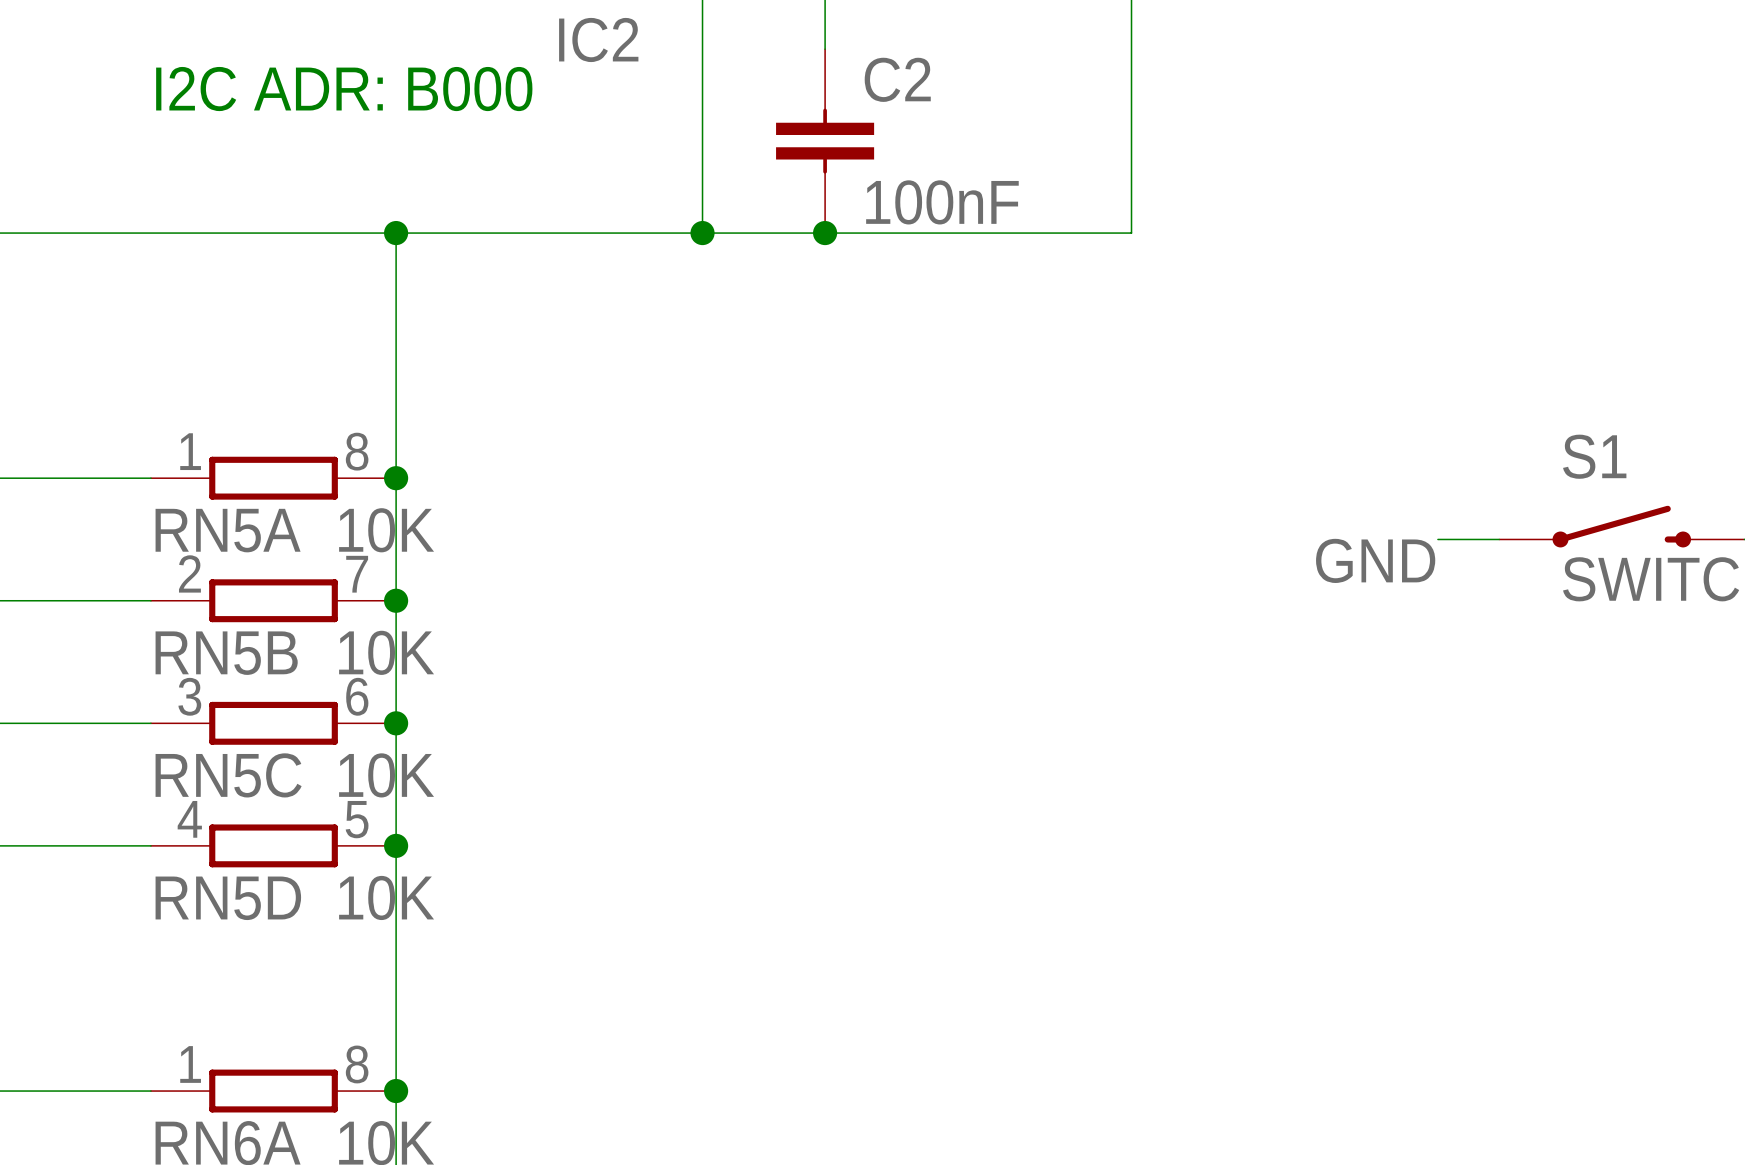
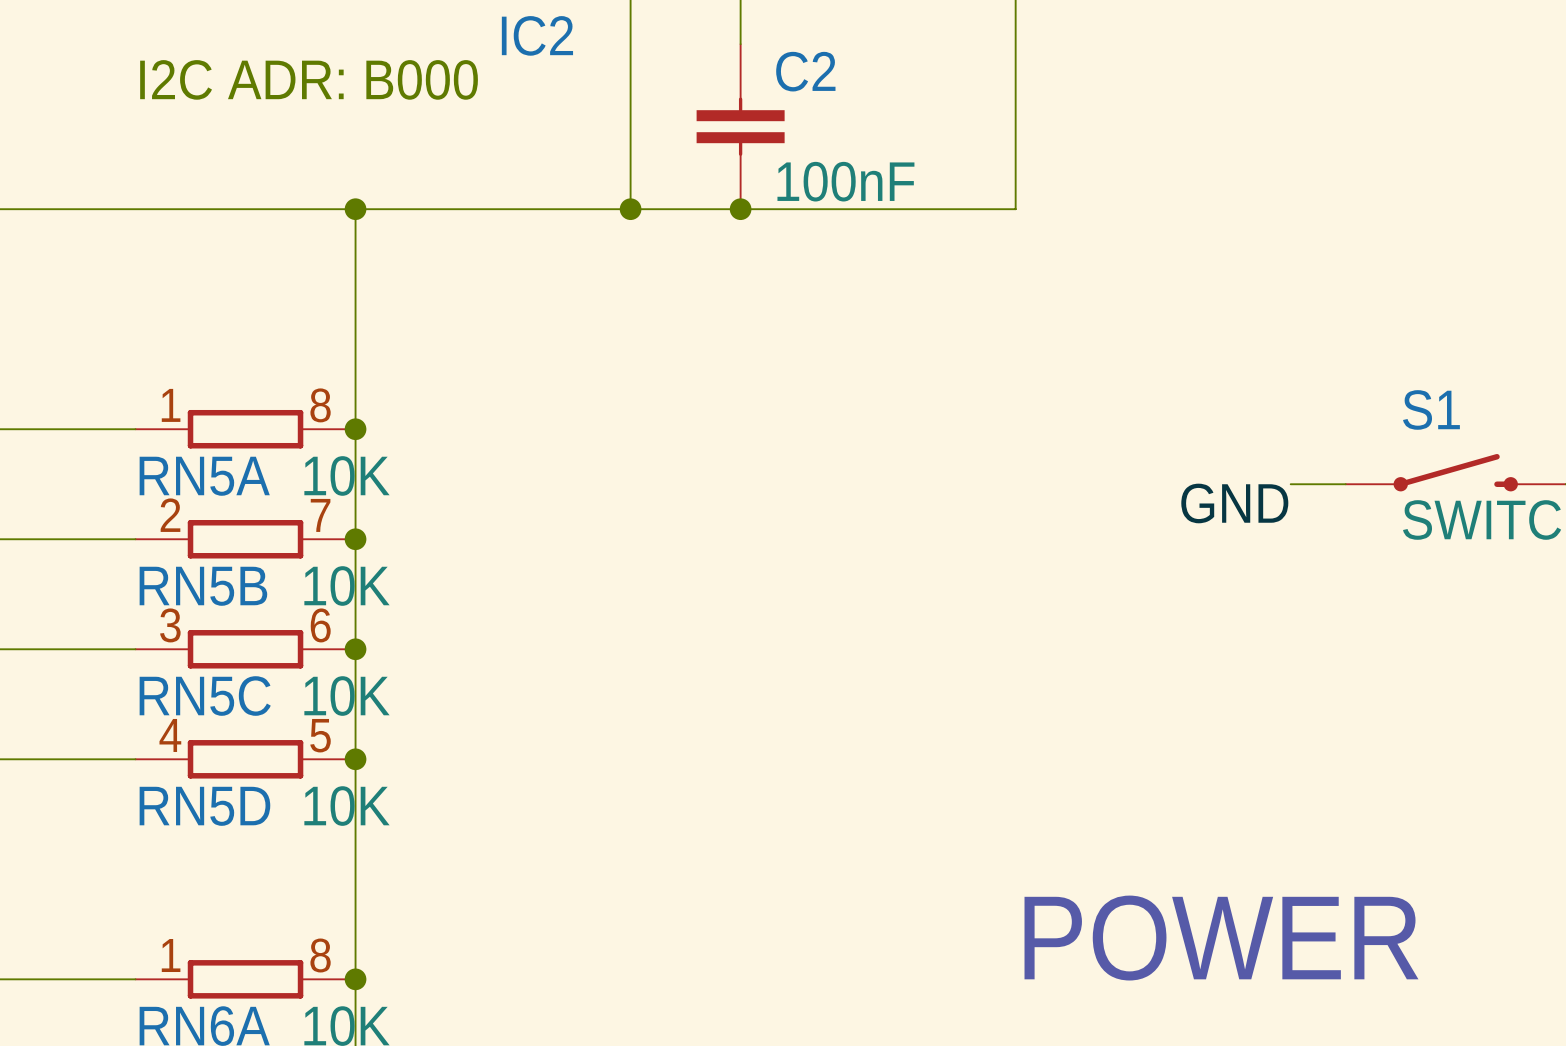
text: none -> POWER (1221, 938)

